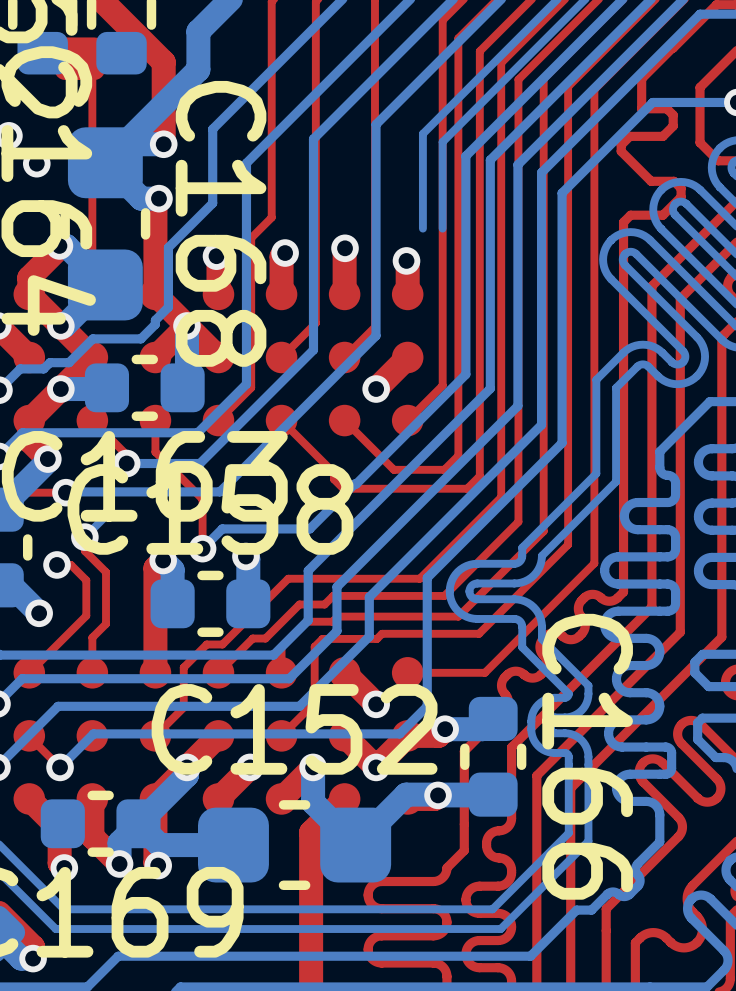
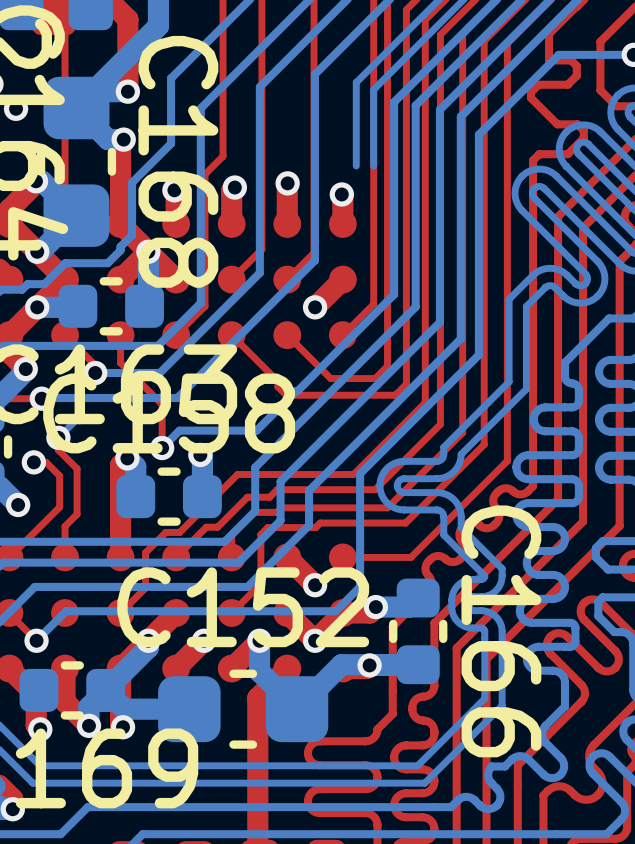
bottom track: (637, 863) (635, 870) (639, 882) (629, 894) (623, 896) (610, 892) (599, 902) -> (545, 725) (542, 731) (543, 739) (563, 762) (563, 768) (560, 774) (553, 778) (546, 776) (524, 756) (517, 756) (511, 759)
bottom track: (576, 910) (538, 948) -> (491, 766) (488, 776) (499, 793) (500, 799) (496, 805) (487, 808) (470, 797) (463, 797) (457, 800)

